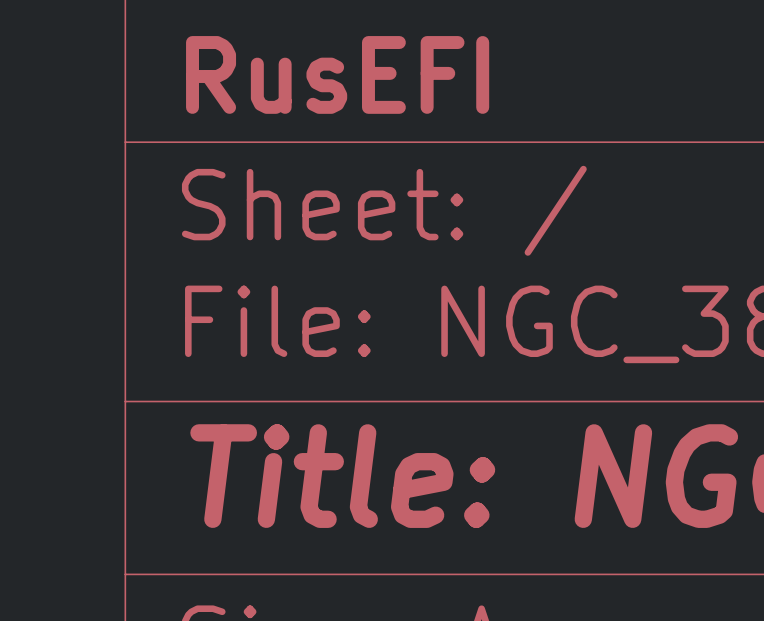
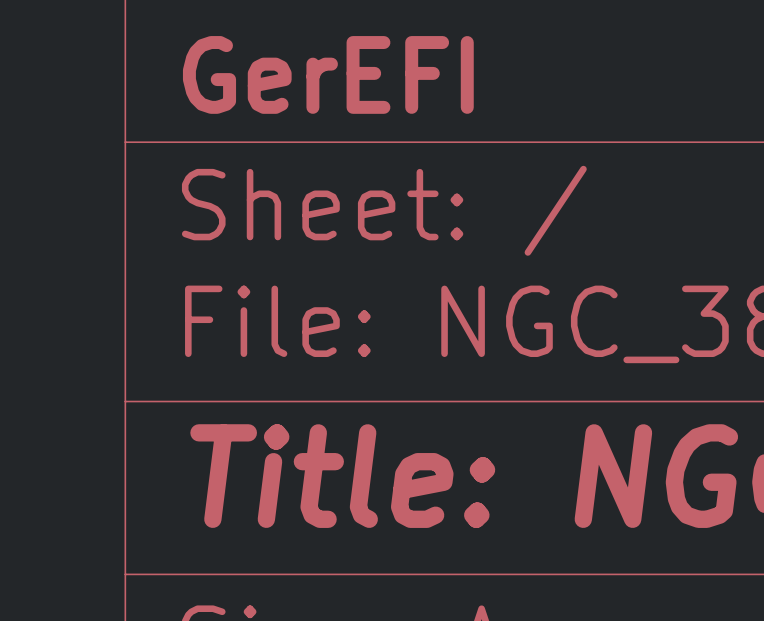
title block: RusEFI (337, 74) -> GerEFI (328, 74)

